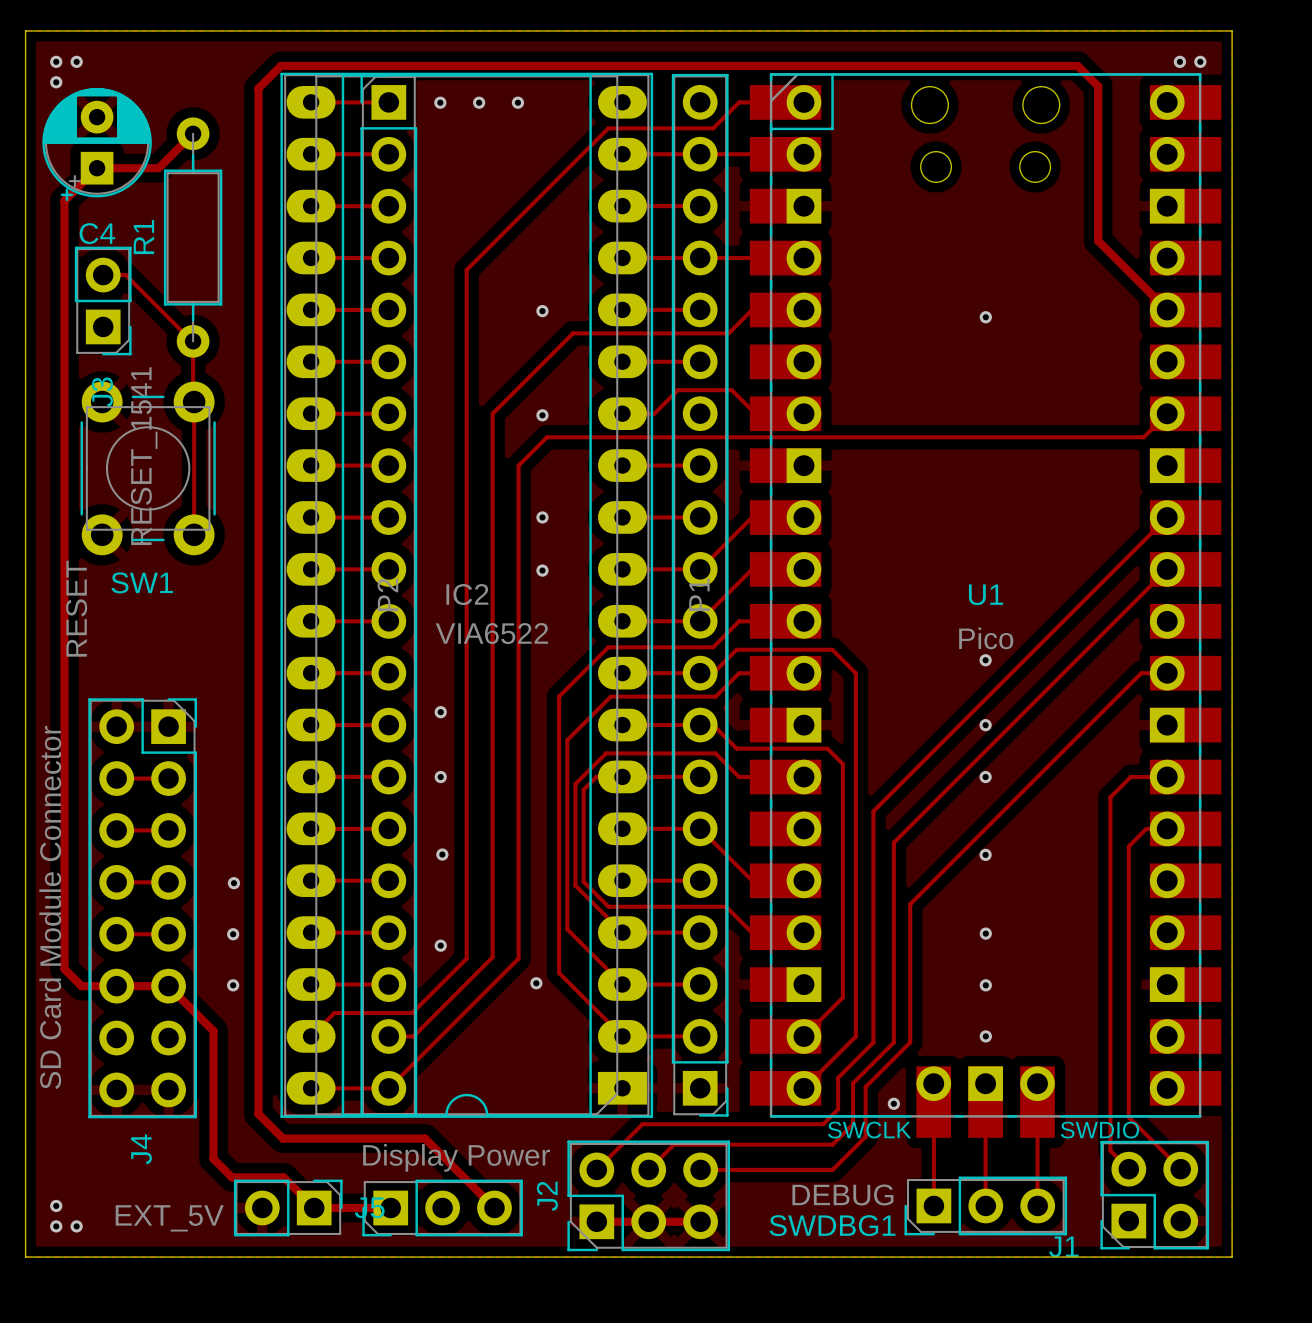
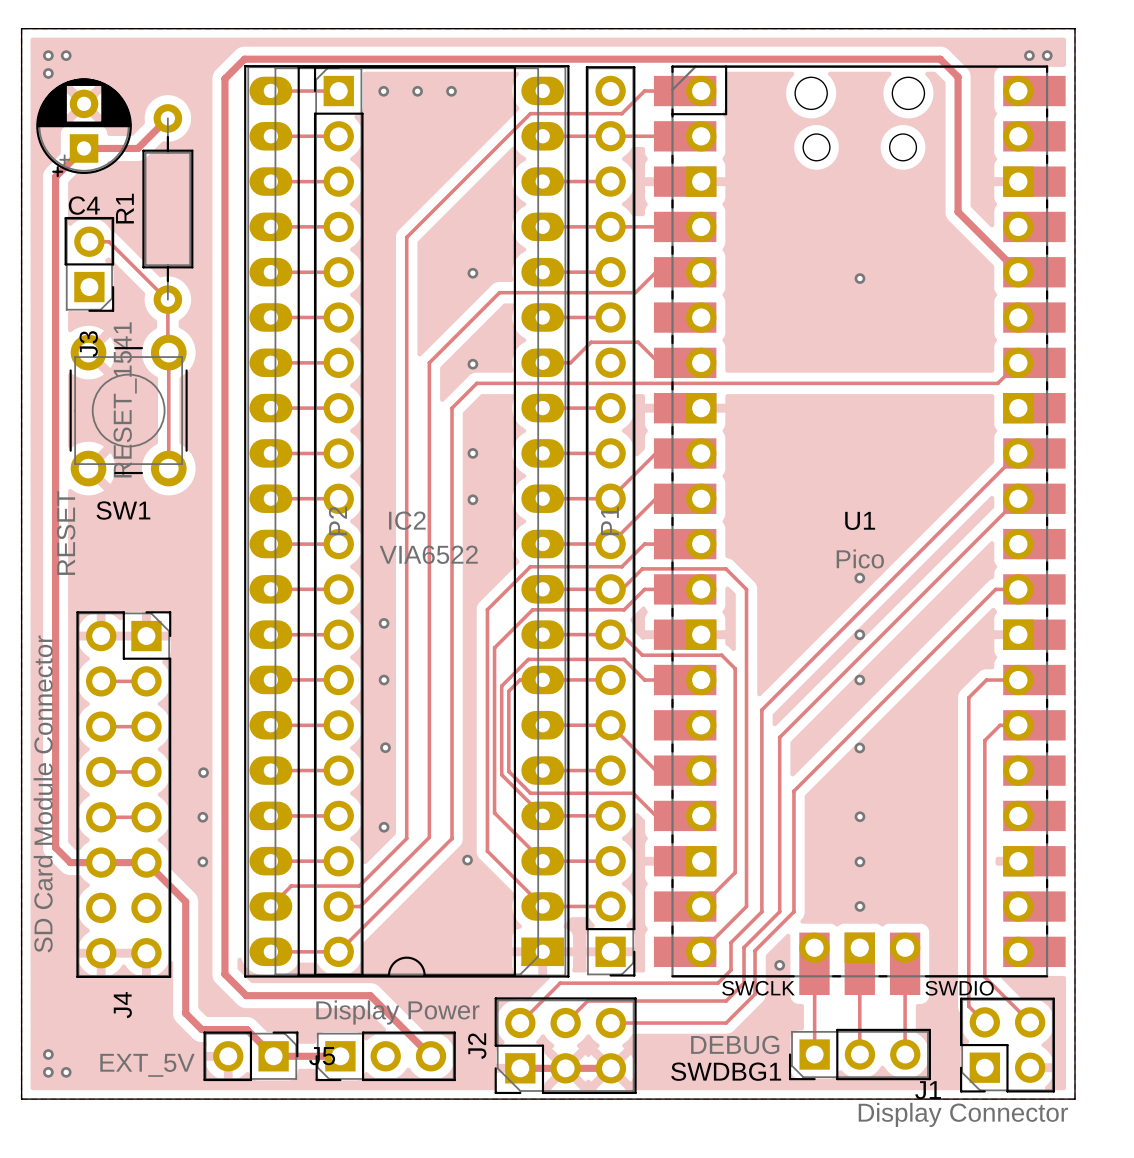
J1 value: none -> Display Connector (963, 1114)

